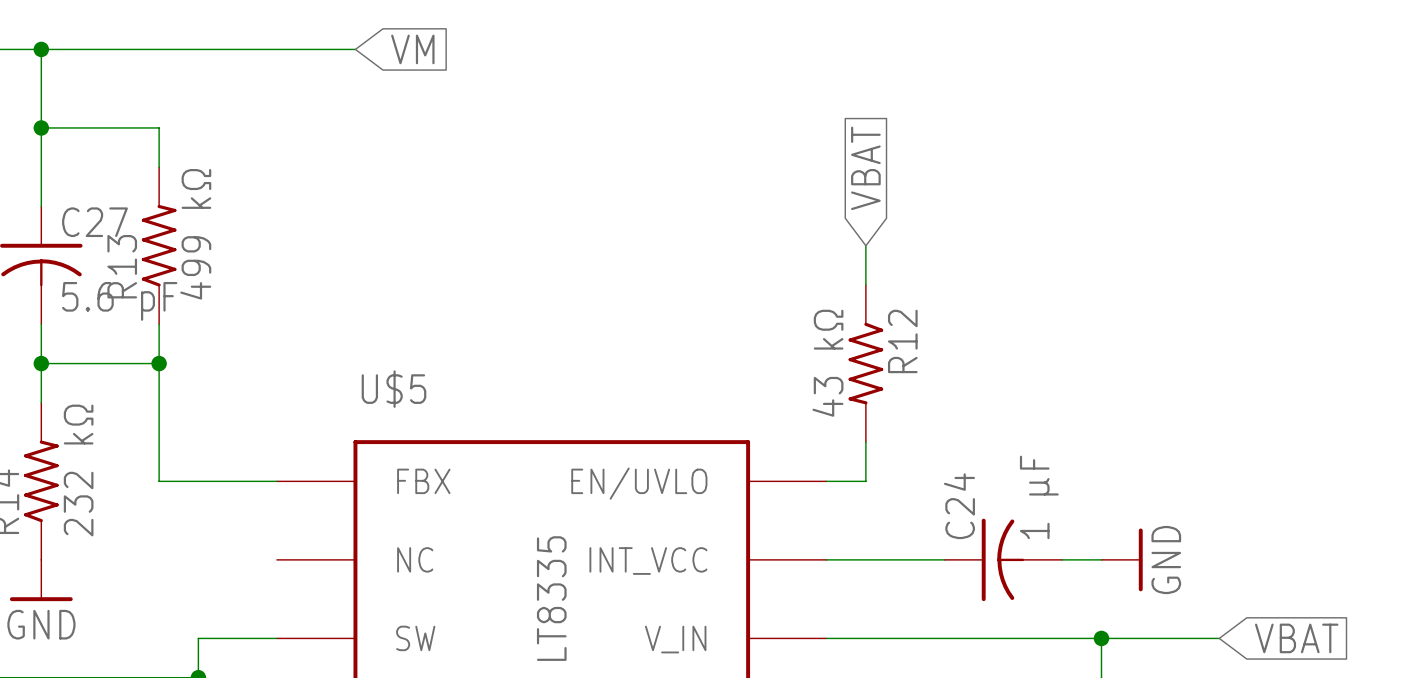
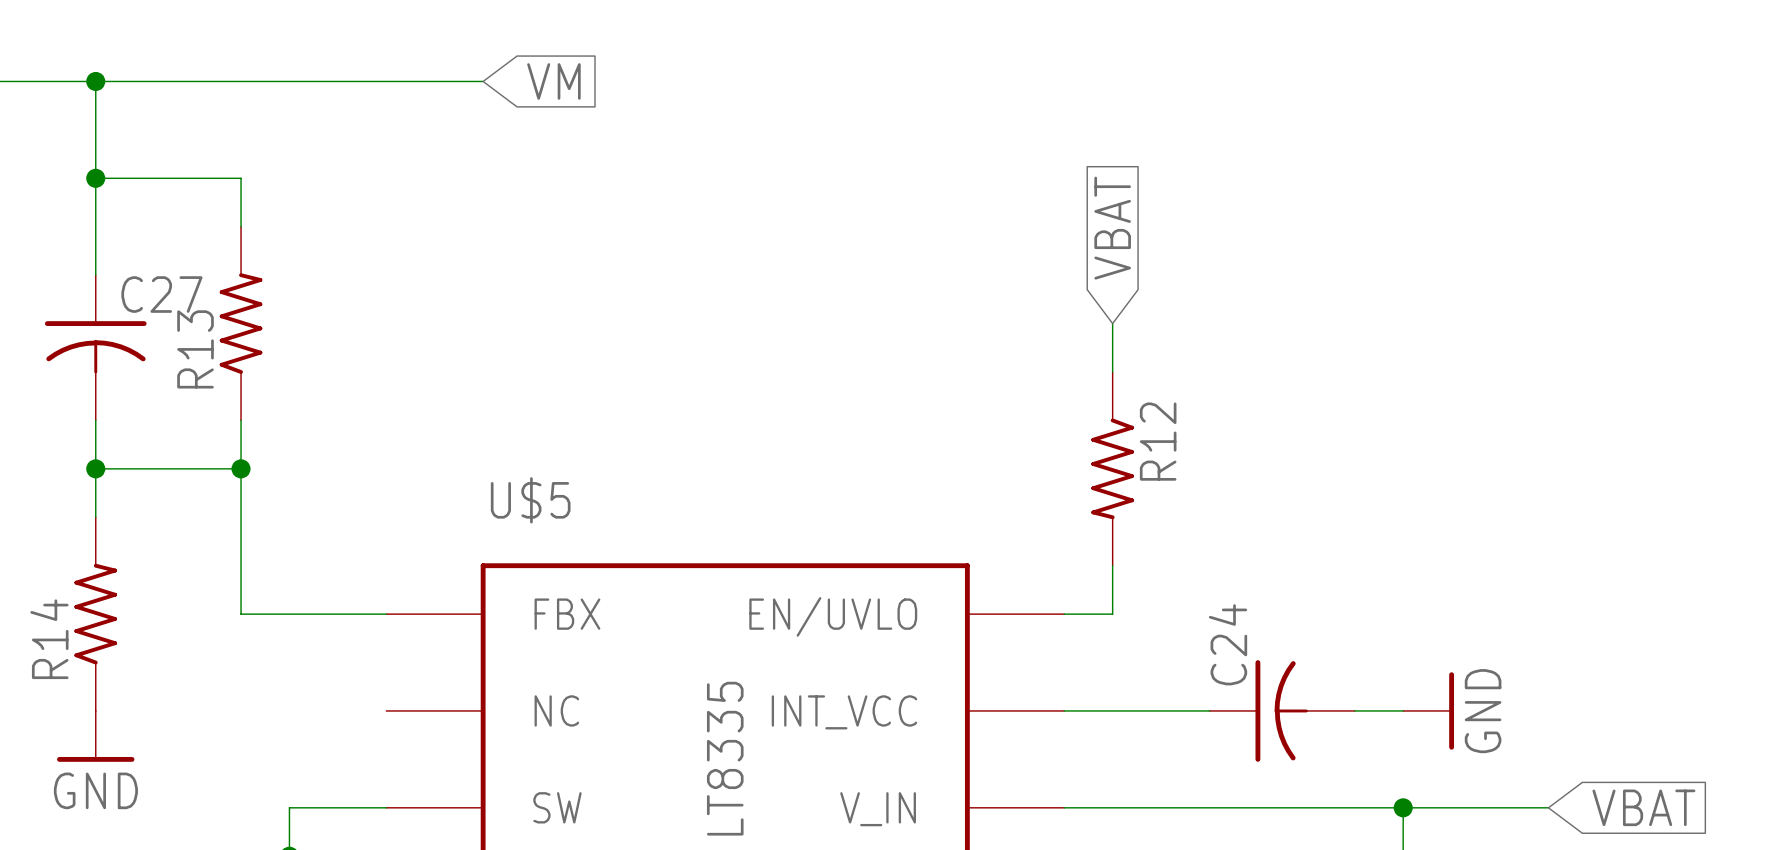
R13 value: 499 kΩ (195, 234) -> none
C27 value: 5.6 pF (119, 301) -> none
R12 value: 43 kΩ (827, 363) -> none
R14 value: 232 kΩ (78, 470) -> none
C24 value: 1 μF (1039, 497) -> none

